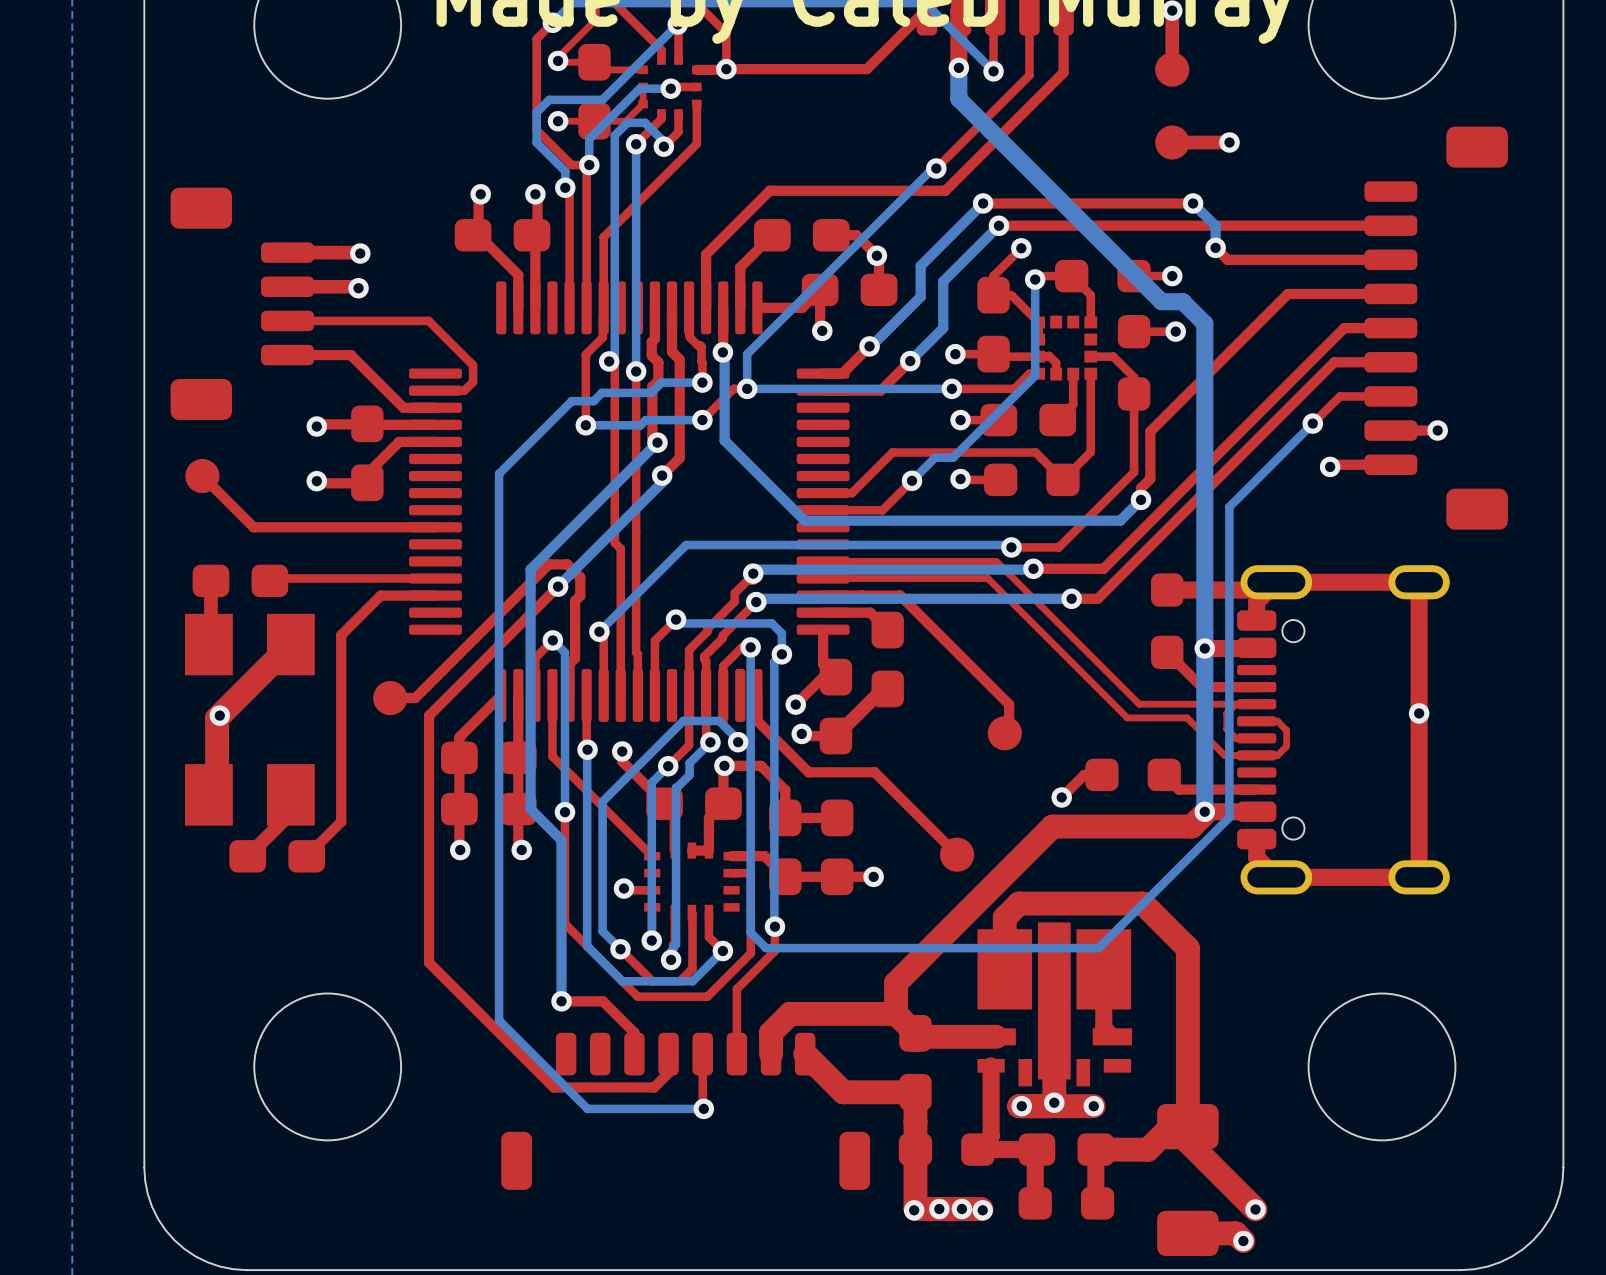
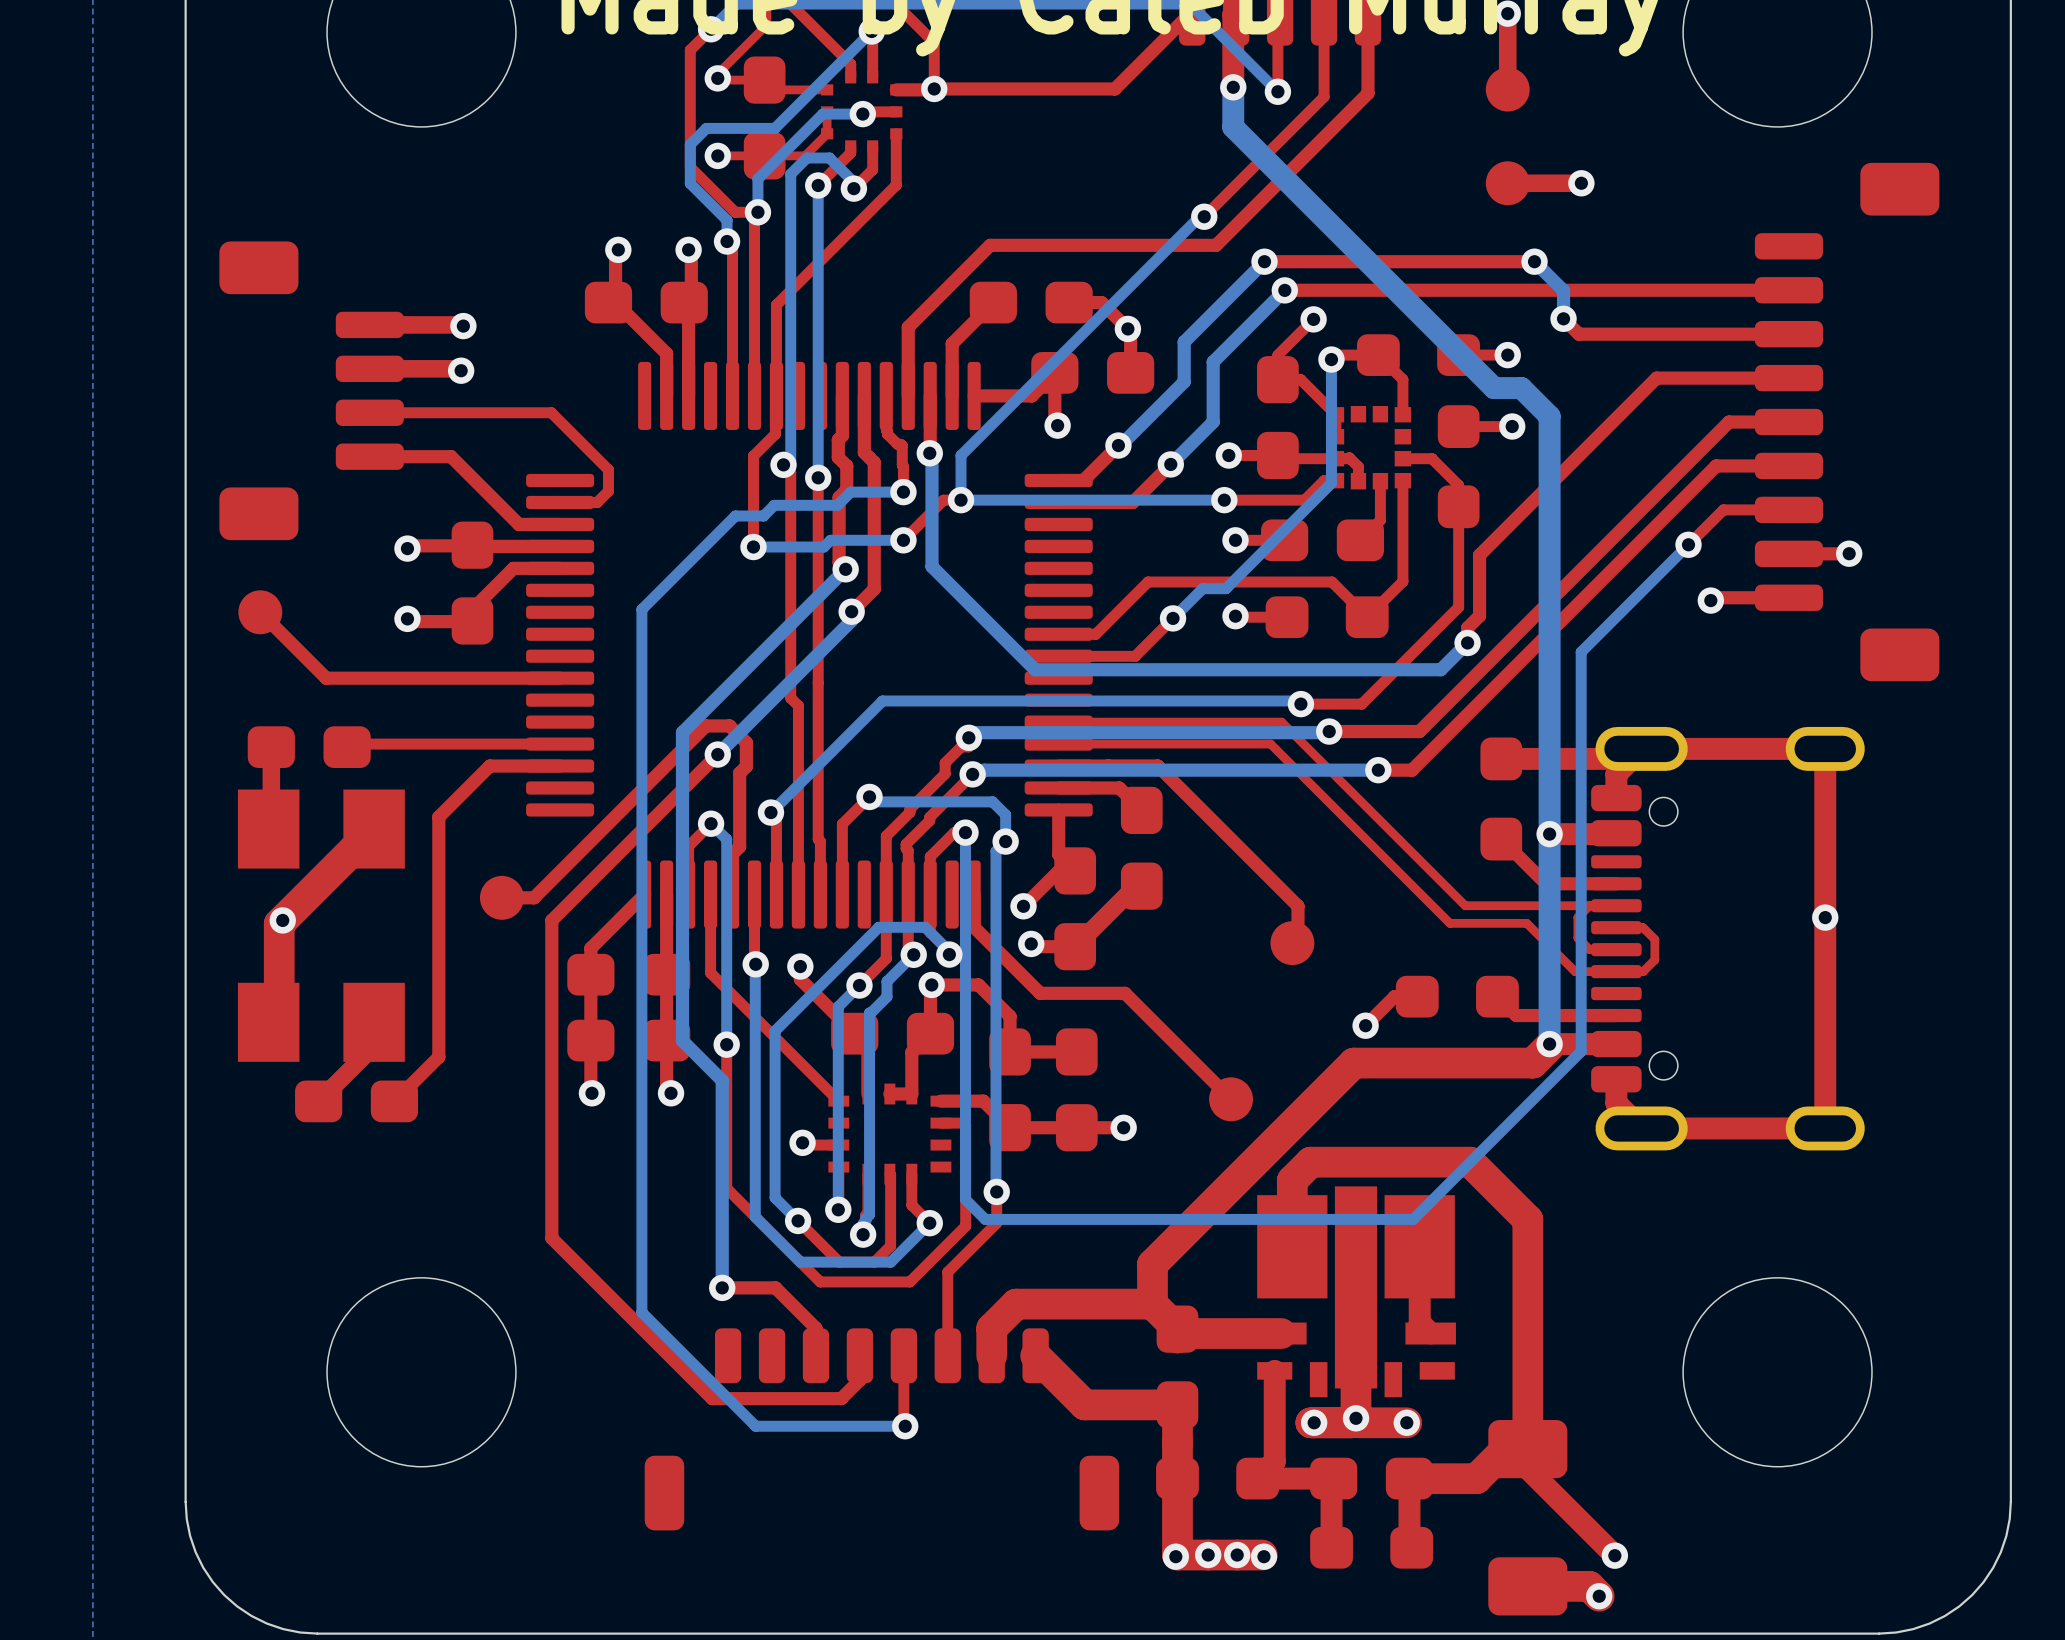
top track width: thick (1187, 1126) (1187, 1141) (1255, 1209) -> thin (1527, 1449) (1527, 1468) (1614, 1555)

